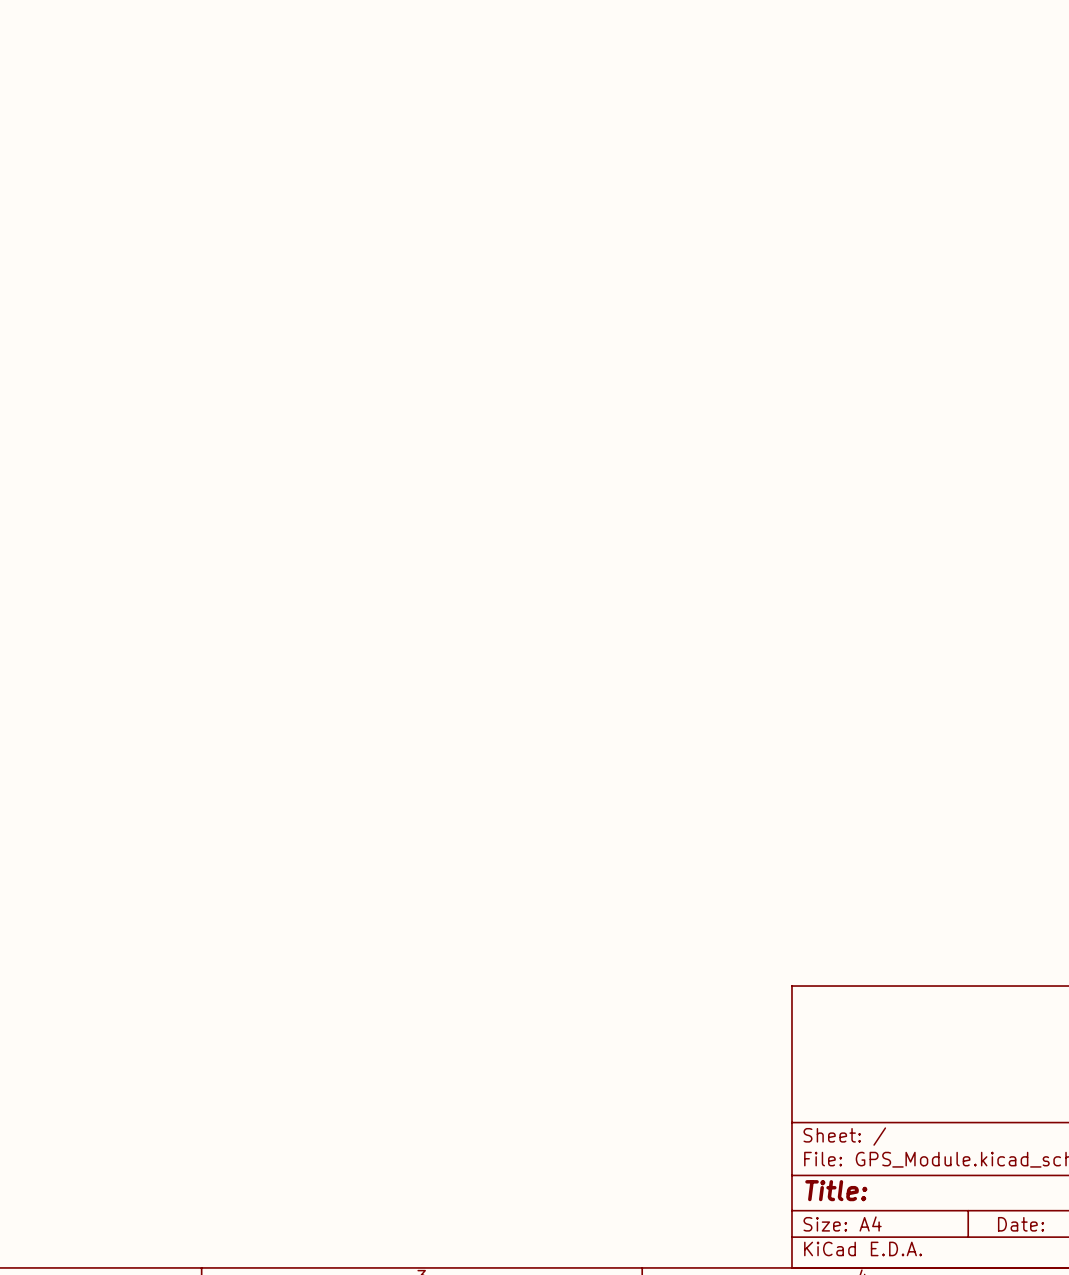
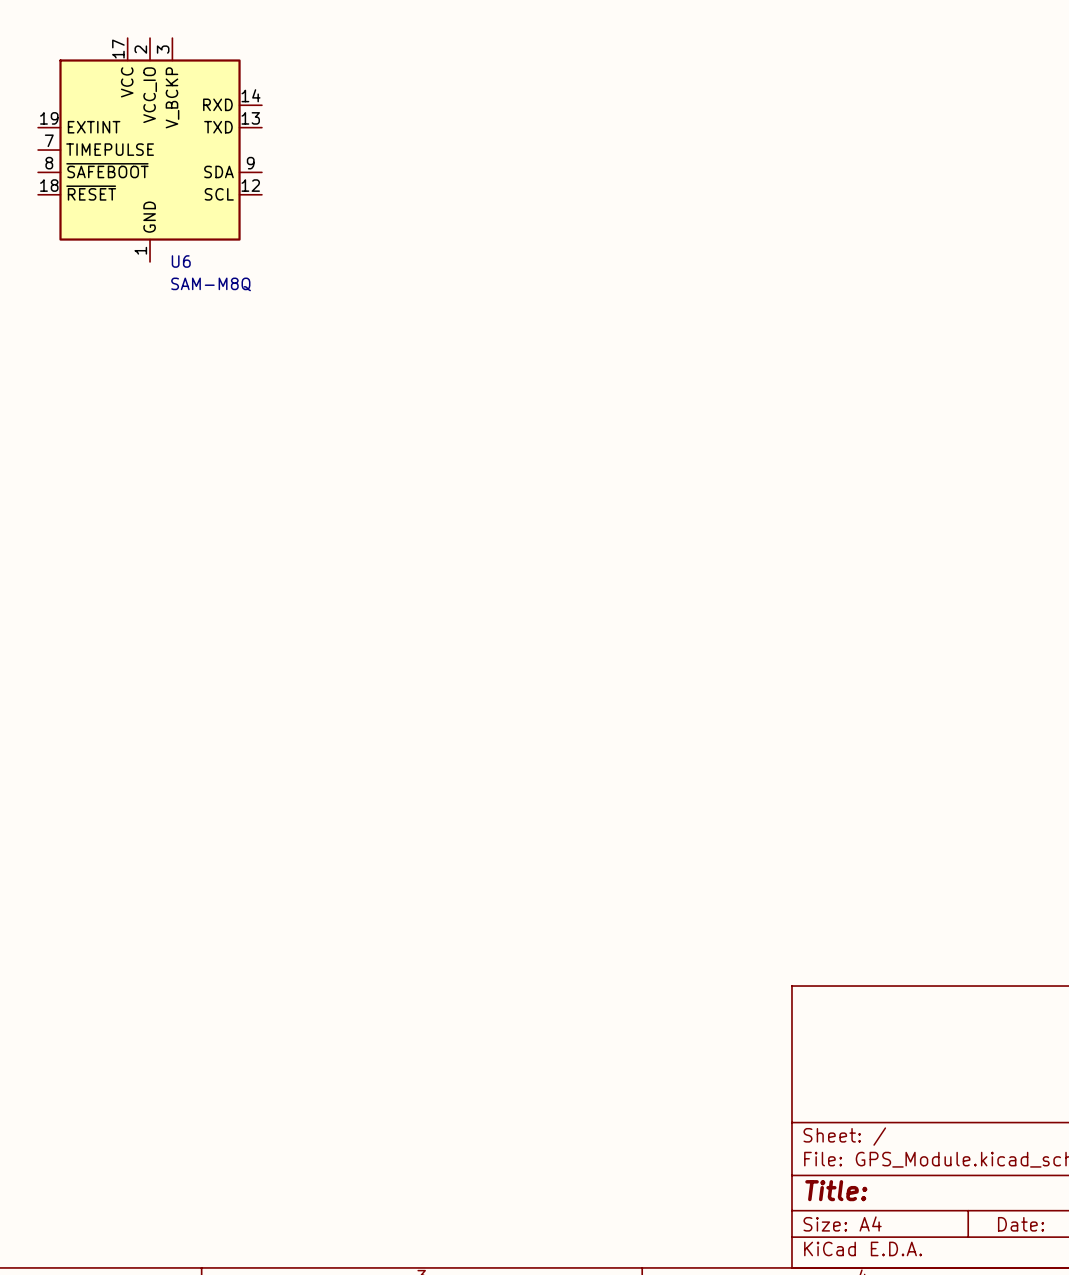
U6: none -> SAM-M8Q (150, 150)

